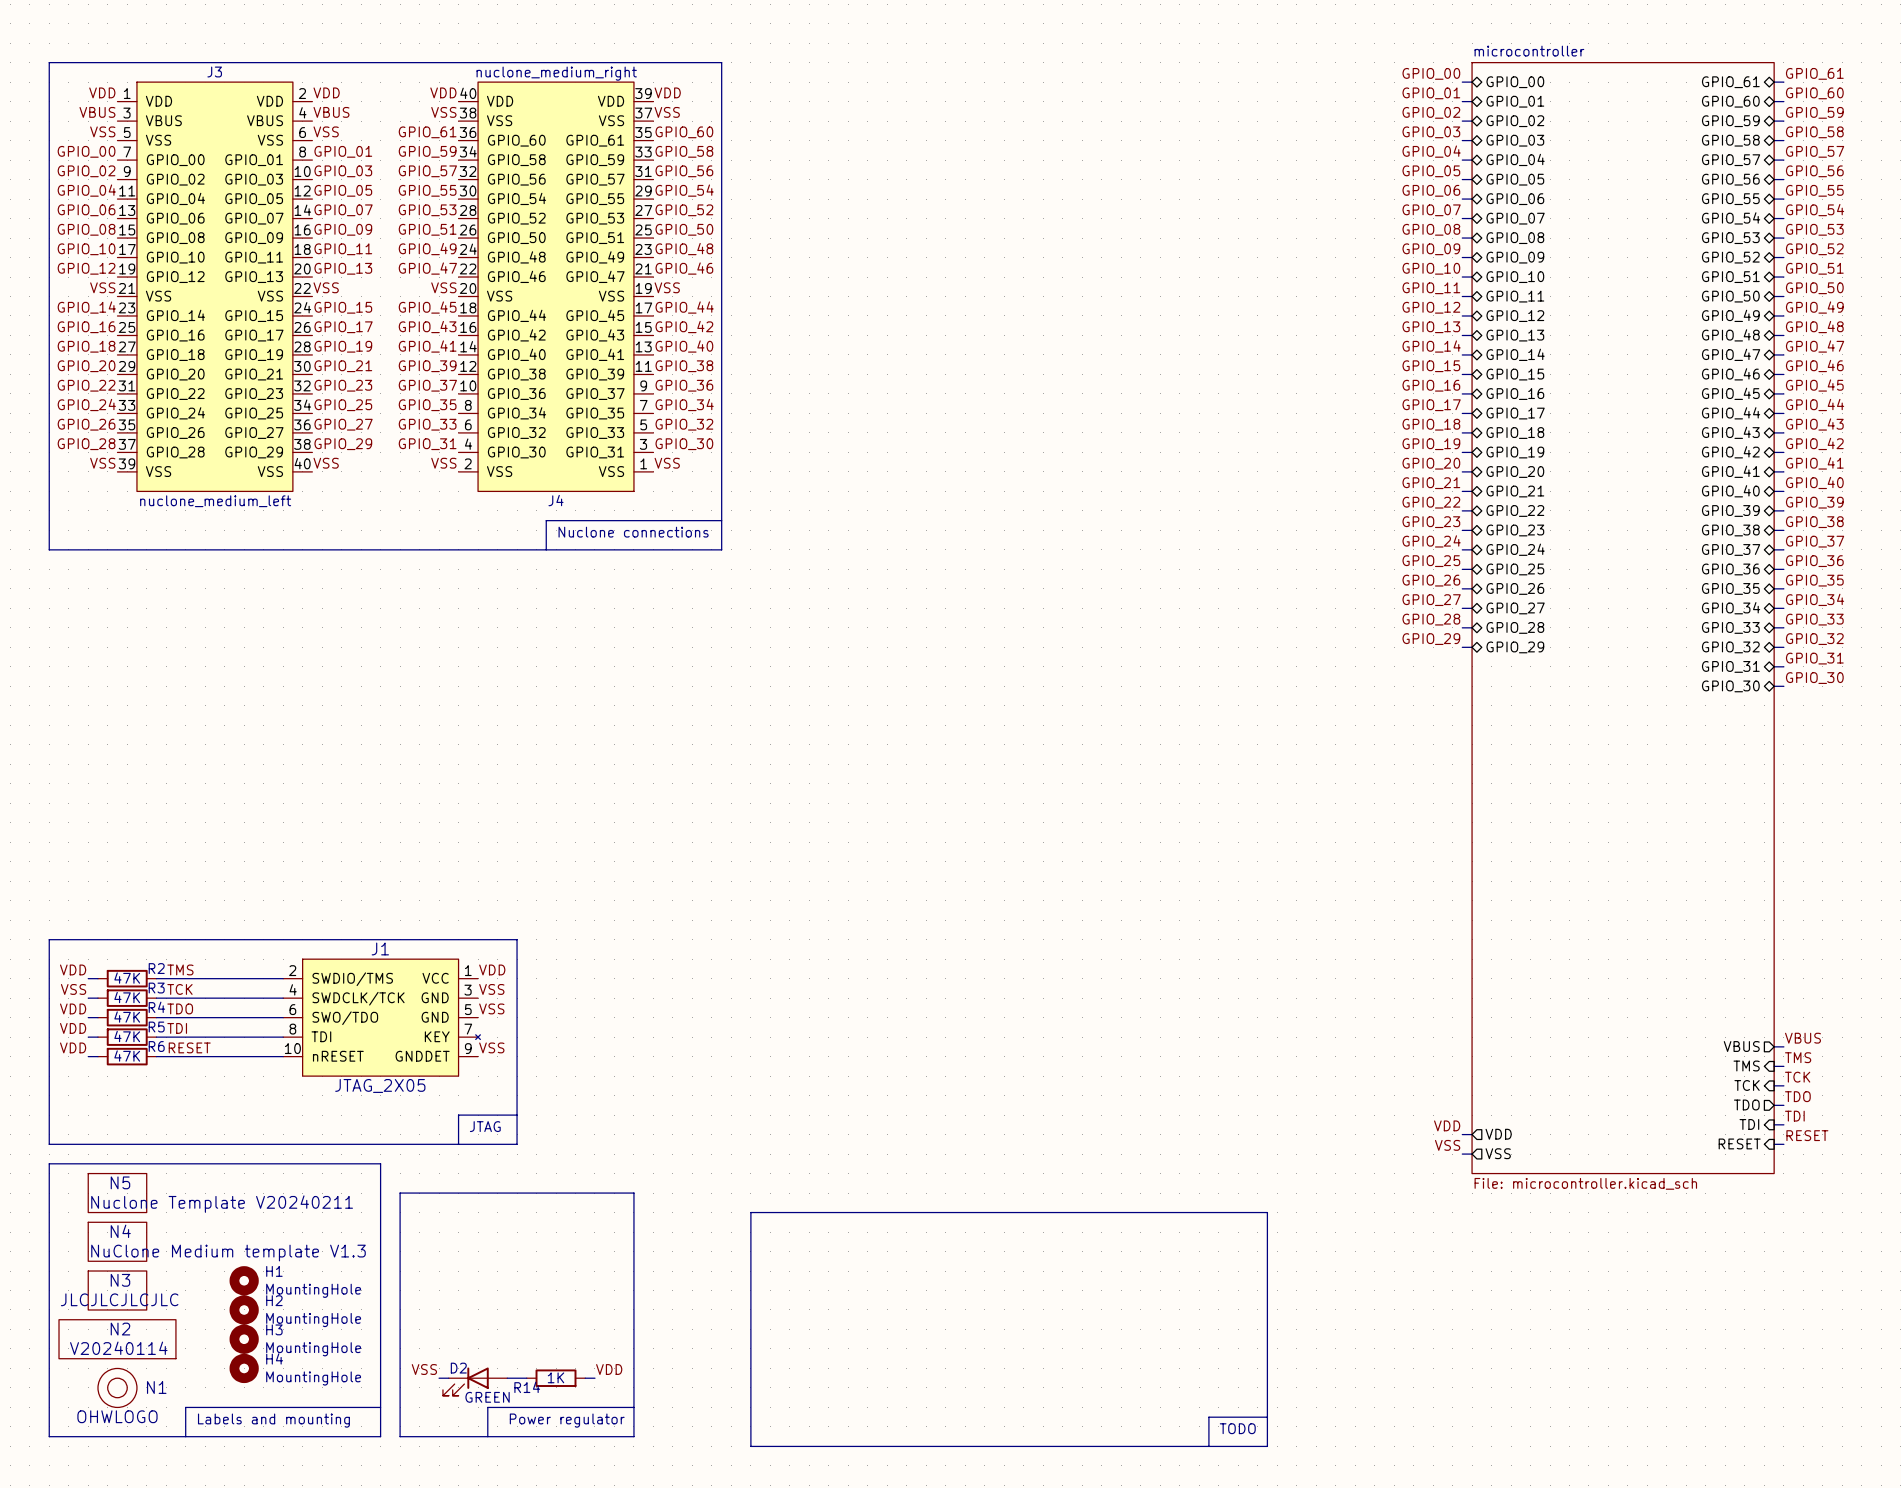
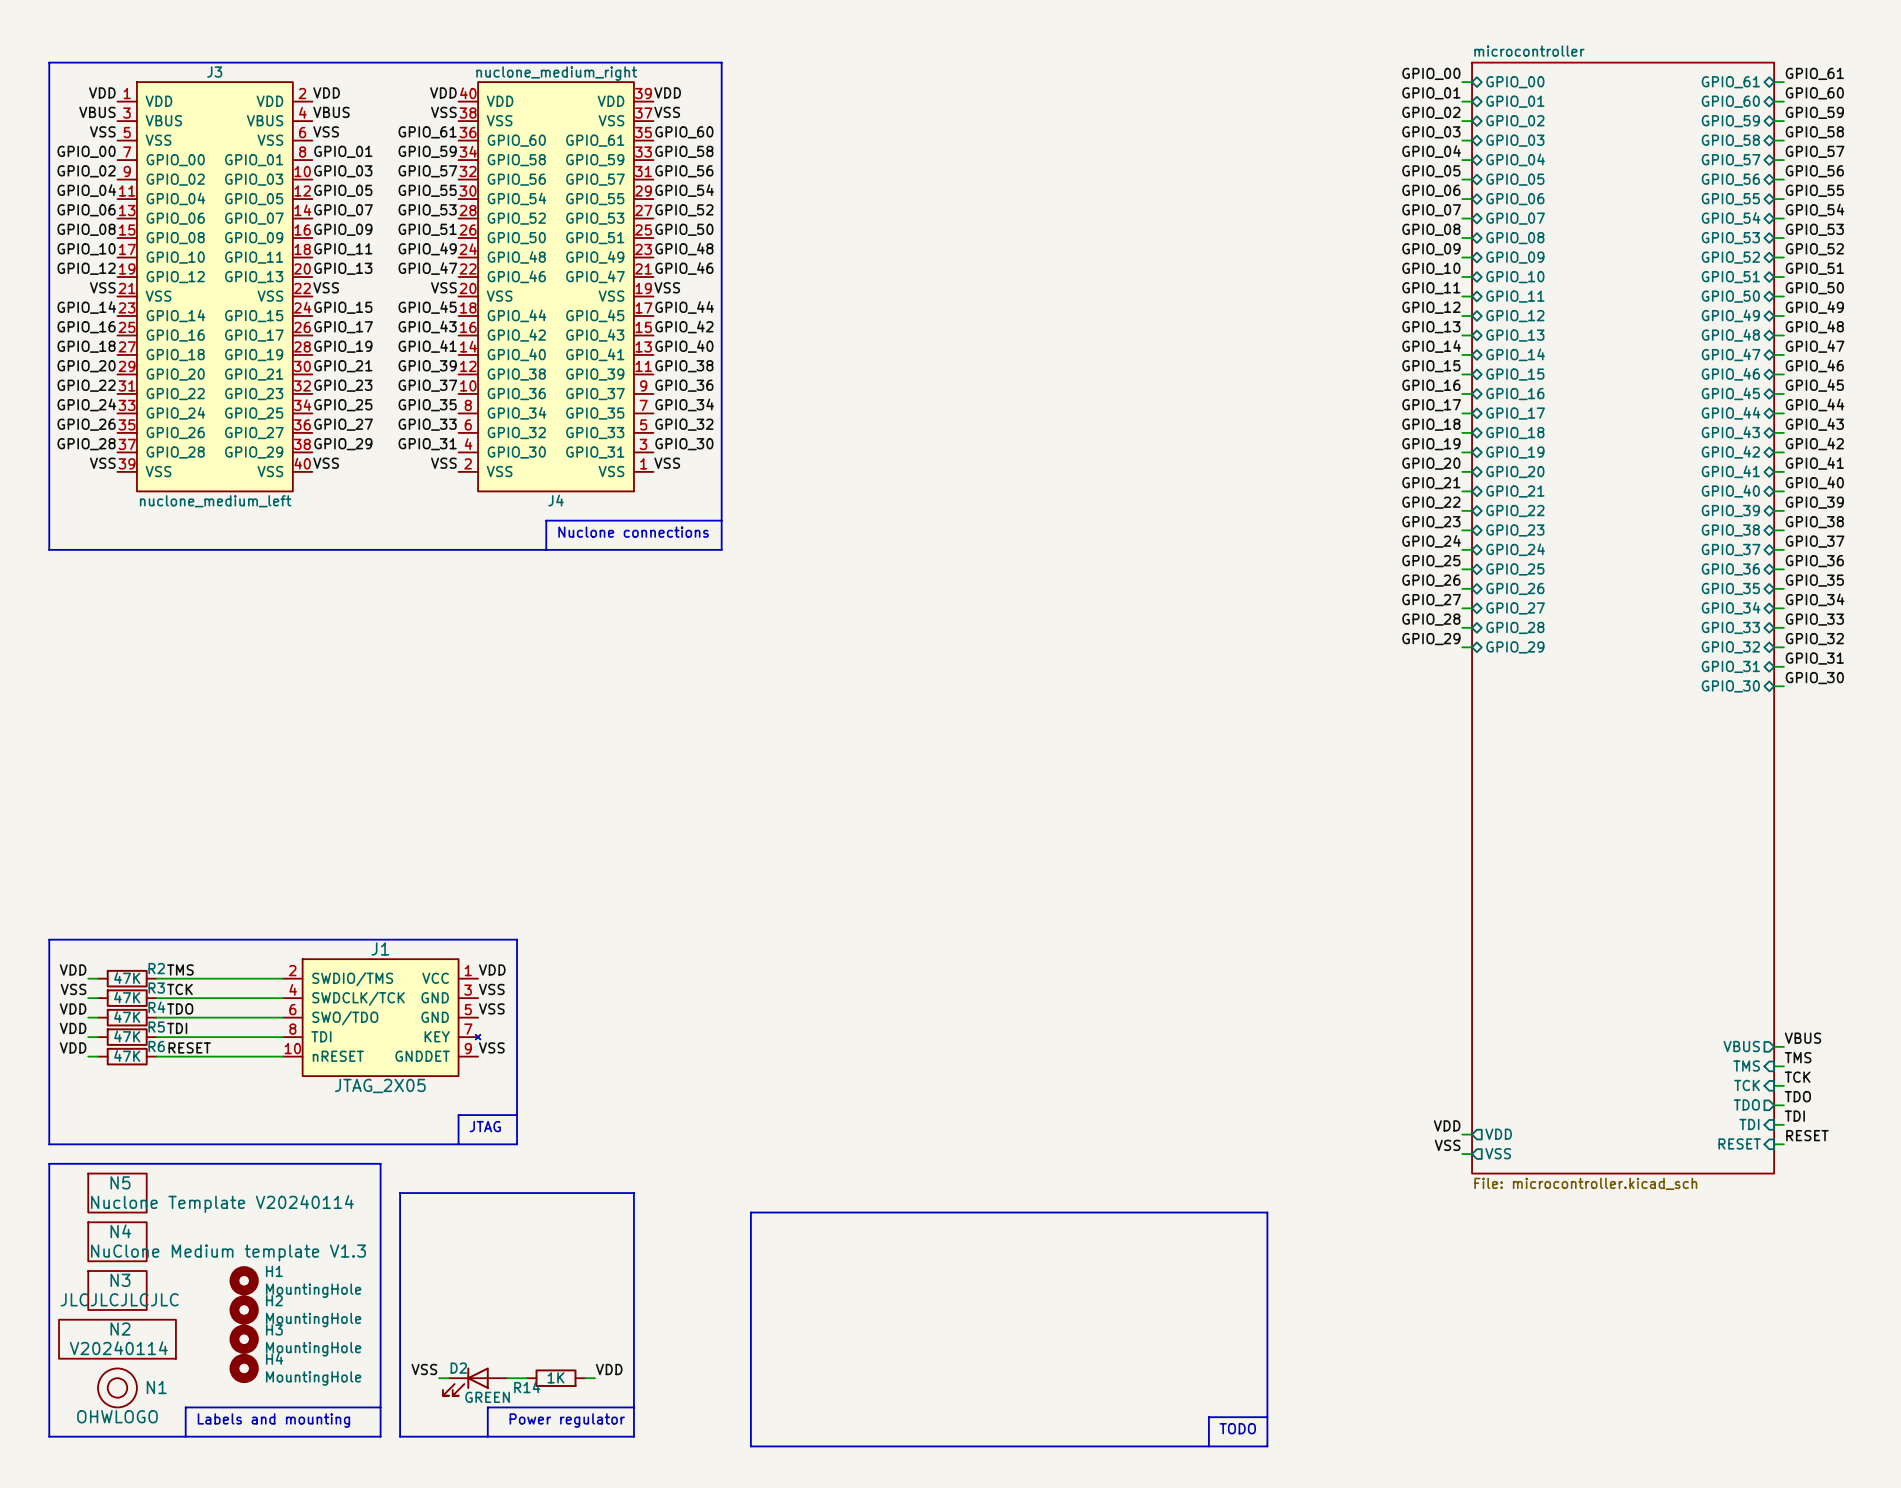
N5 value: Nuclone Template V20240211 (222, 1204) -> Nuclone Template V20240114 (222, 1204)

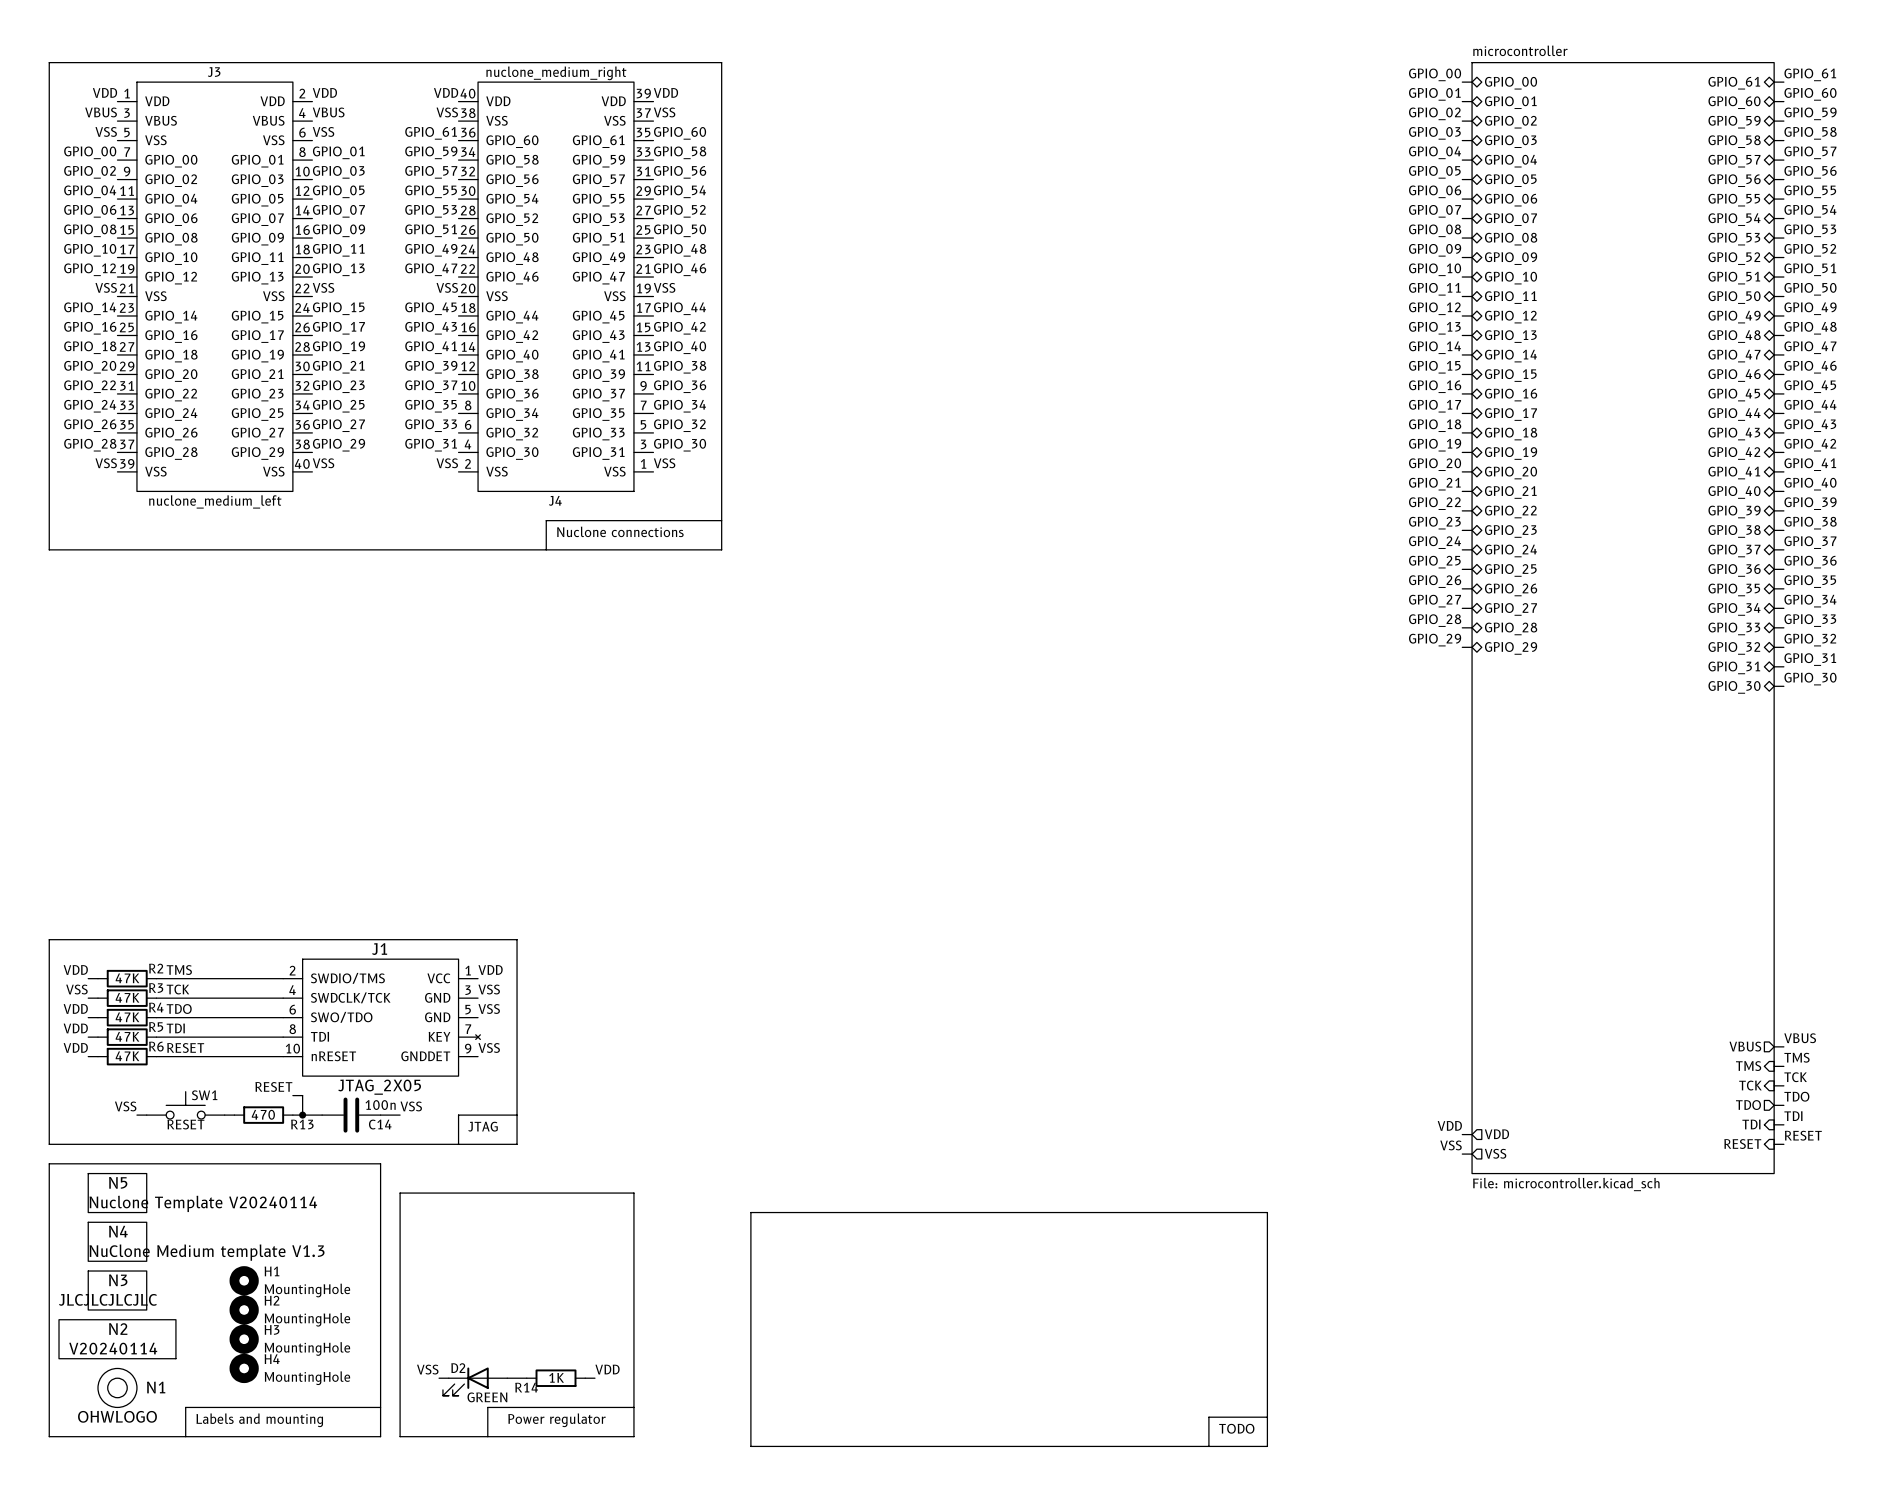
label: none -> RESET (273, 1086)
wire: none -> (292, 1095) (302, 1095) (302, 1115)
SW1: none -> RESET (185, 1105)
label: none -> VSS (125, 1106)
label: none -> VSS (411, 1106)
wire: none -> (136, 1115) (146, 1115)
wire: none -> (224, 1115) (234, 1115)
R13: none -> 470 (263, 1115)
wire: none -> (292, 1115) (322, 1115)
junction: none -> (302, 1115)
C14: none -> 100n (351, 1115)
wire: none -> (380, 1115) (400, 1115)

